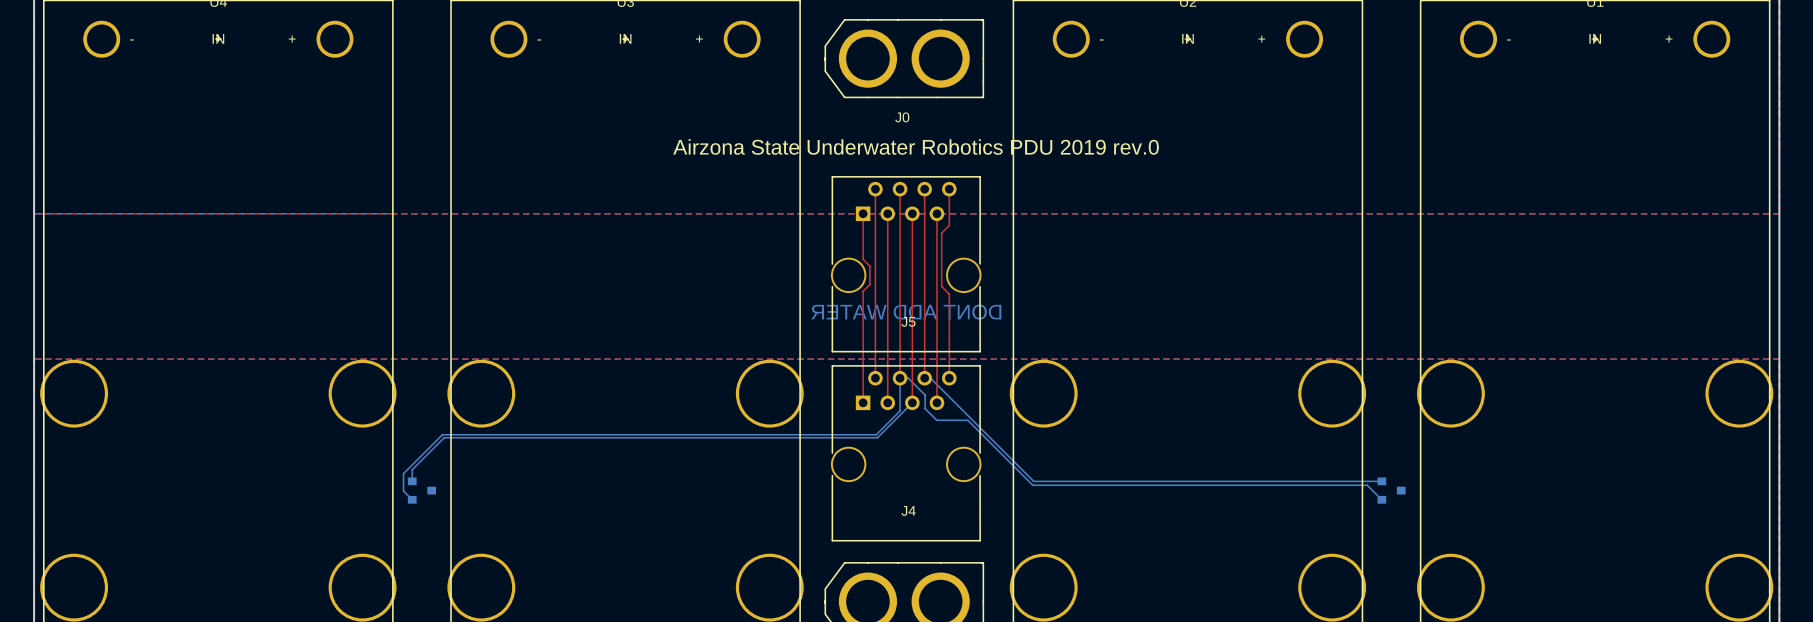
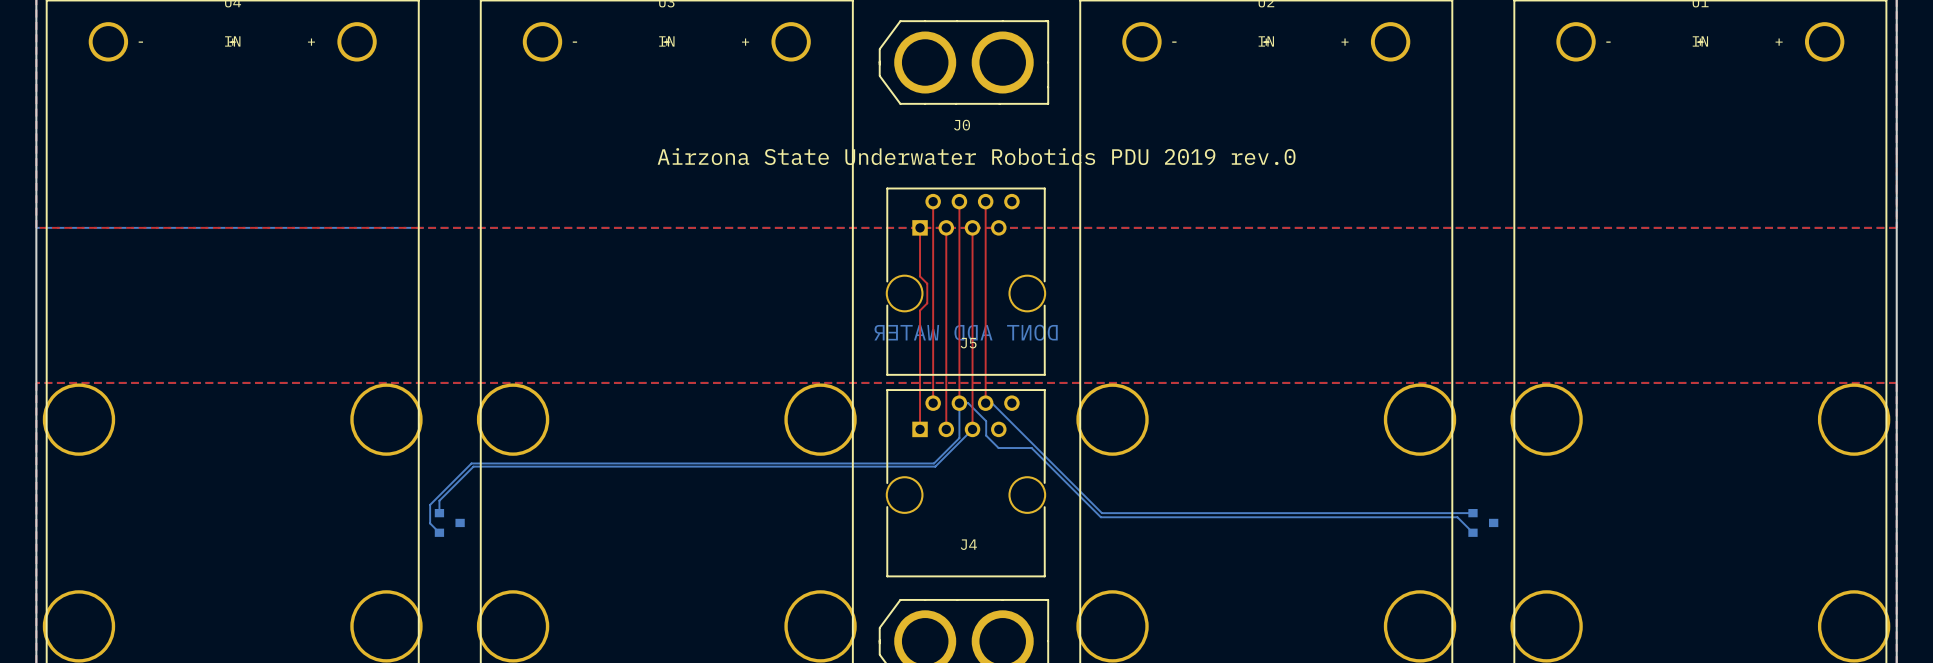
top track: (949, 189) (949, 225) (941, 233) (941, 286) (949, 294) (949, 378) -> none
top track: (936, 213) (936, 402) -> none

